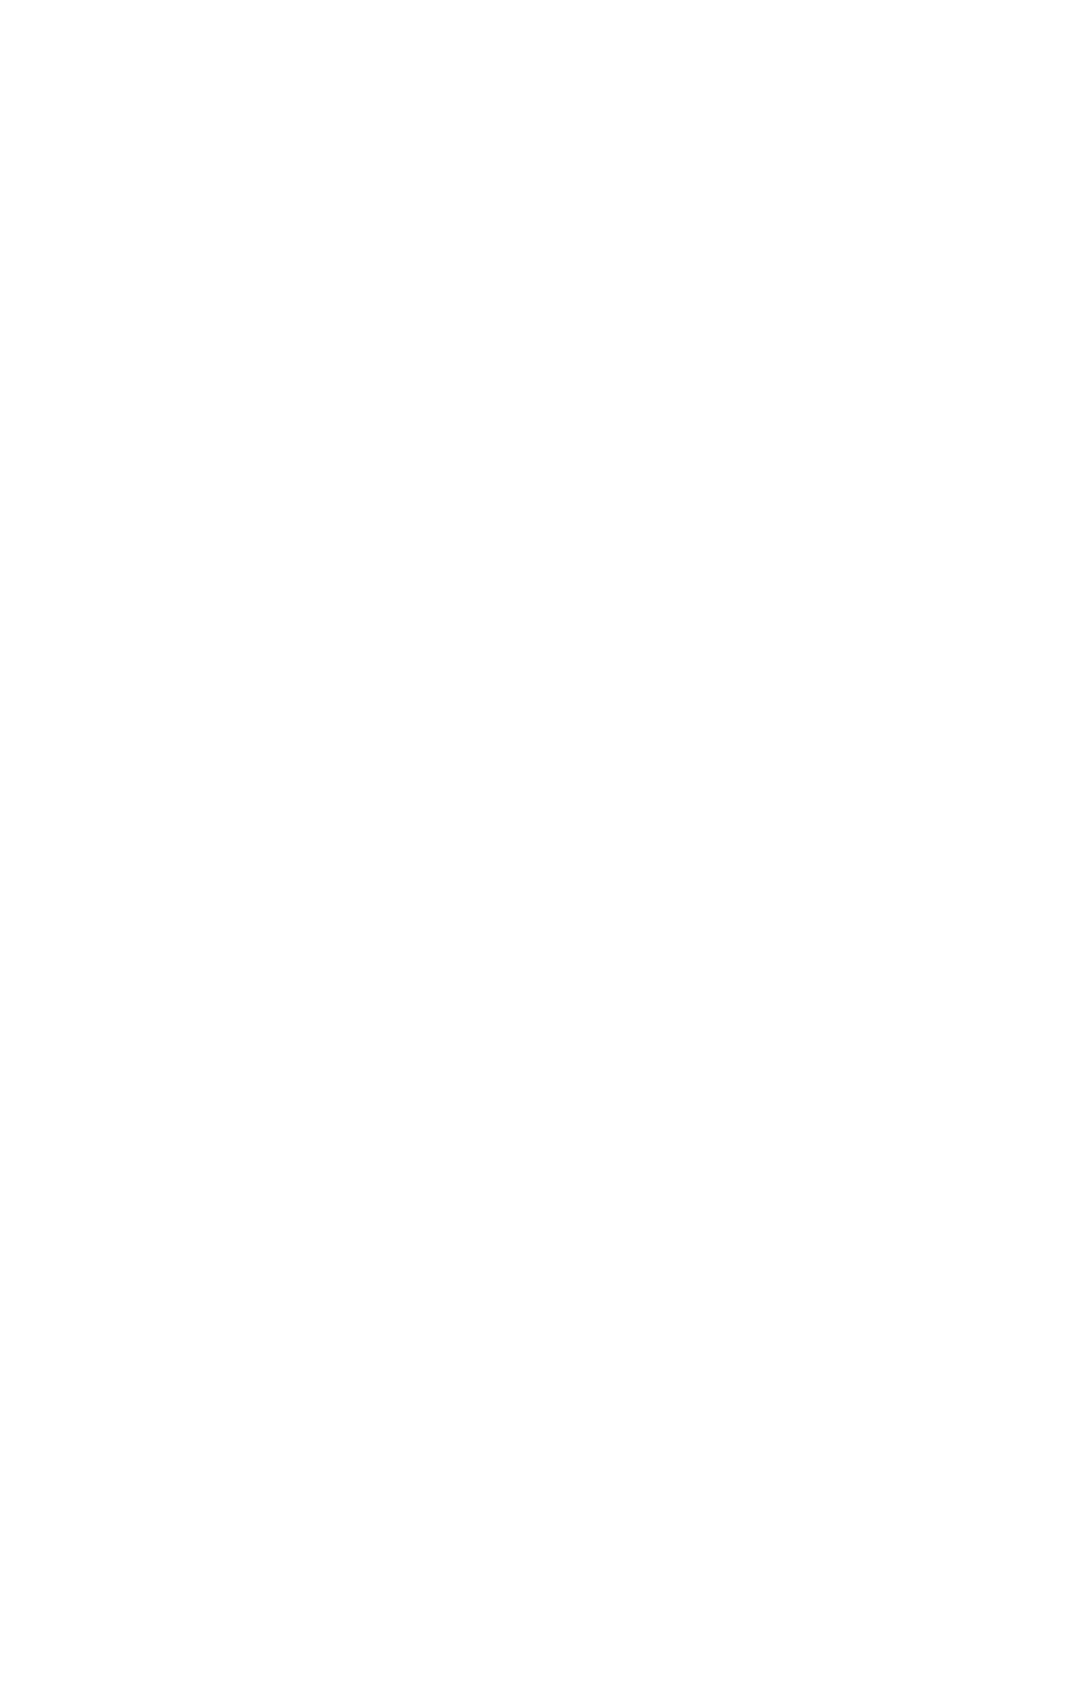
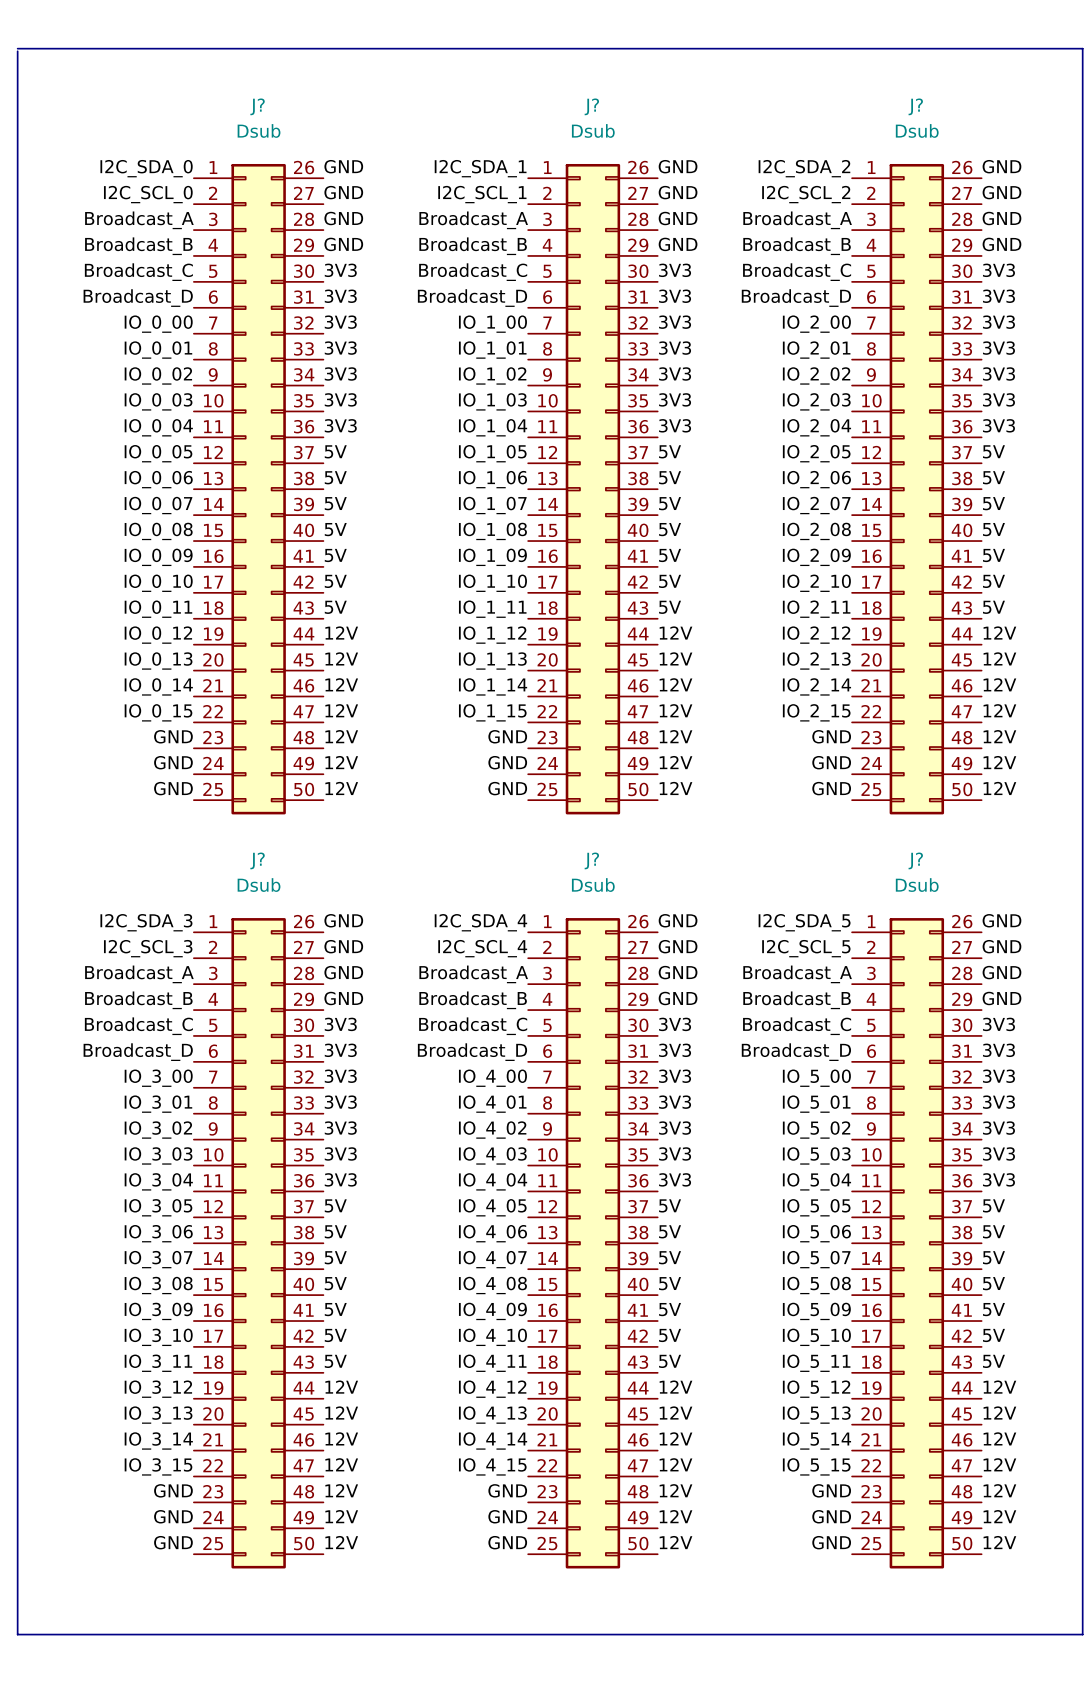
line: none -> (17, 48) (1082, 48) (1082, 1634) (17, 1634) (17, 51)
label: none -> GND (343, 166)
label: none -> GND (678, 166)
label: none -> GND (1001, 166)
label: none -> I2C_SDA_0 (146, 168)
label: none -> I2C_SDA_1 (480, 168)
label: none -> I2C_SDA_2 (804, 168)
label: none -> GND (343, 192)
label: none -> GND (678, 192)
label: none -> GND (1001, 192)
label: none -> I2C_SCL_0 (148, 194)
label: none -> I2C_SCL_1 (482, 194)
label: none -> I2C_SCL_2 (806, 194)
label: none -> GND (343, 218)
label: none -> GND (678, 218)
label: none -> GND (1001, 218)
label: none -> Broadcast_A (139, 220)
label: none -> Broadcast_A (473, 220)
label: none -> Broadcast_A (797, 220)
label: none -> GND (343, 244)
label: none -> GND (678, 244)
label: none -> GND (1001, 244)
label: none -> Broadcast_B (138, 246)
label: none -> Broadcast_B (473, 246)
label: none -> Broadcast_B (797, 246)
label: none -> 3V3 (340, 270)
label: none -> 3V3 (675, 270)
label: none -> 3V3 (998, 270)
label: none -> Broadcast_C (138, 272)
label: none -> Broadcast_C (473, 272)
label: none -> Broadcast_C (797, 272)
label: none -> 3V3 (340, 296)
label: none -> 3V3 (675, 296)
label: none -> 3V3 (998, 296)
label: none -> Broadcast_D (138, 298)
label: none -> Broadcast_D (472, 298)
label: none -> Broadcast_D (796, 298)
label: none -> 3V3 (340, 322)
label: none -> 3V3 (675, 322)
label: none -> 3V3 (998, 322)
label: none -> IO_0_00 (158, 324)
label: none -> IO_1_00 (492, 324)
label: none -> IO_2_00 (816, 324)
label: none -> 3V3 (340, 348)
label: none -> 3V3 (675, 348)
label: none -> 3V3 (998, 348)
label: none -> IO_0_01 (158, 350)
label: none -> IO_1_01 (492, 350)
label: none -> IO_2_01 (816, 350)
label: none -> 3V3 (340, 373)
label: none -> 3V3 (675, 373)
label: none -> 3V3 (998, 373)
label: none -> IO_0_02 (158, 375)
label: none -> IO_1_02 (492, 375)
label: none -> IO_2_02 (816, 375)
label: none -> 3V3 (340, 399)
label: none -> 3V3 (675, 399)
label: none -> 3V3 (998, 399)
label: none -> IO_0_03 (158, 401)
label: none -> IO_1_03 (492, 401)
label: none -> IO_2_03 (816, 401)
label: none -> 3V3 (340, 425)
label: none -> 3V3 (675, 425)
label: none -> 3V3 (998, 425)
label: none -> IO_0_04 (158, 427)
label: none -> IO_1_04 (493, 427)
label: none -> IO_2_04 (816, 427)
label: none -> 5V (335, 451)
label: none -> 5V (670, 451)
label: none -> 5V (993, 451)
label: none -> IO_0_05 (158, 453)
label: none -> IO_1_05 (492, 453)
label: none -> IO_2_05 (816, 453)
label: none -> 5V (335, 477)
label: none -> 5V (670, 477)
label: none -> 5V (993, 477)
label: none -> IO_0_06 (158, 479)
label: none -> IO_1_06 (492, 479)
label: none -> IO_2_06 (816, 479)
J?: none -> Dsub (258, 489)
J?: none -> Dsub (592, 489)
J?: none -> Dsub (916, 489)
label: none -> 5V (335, 503)
label: none -> 5V (670, 503)
label: none -> 5V (993, 503)
label: none -> IO_0_07 (158, 505)
label: none -> IO_1_07 (492, 505)
label: none -> IO_2_07 (816, 505)
label: none -> 5V (335, 529)
label: none -> 5V (670, 529)
label: none -> 5V (993, 529)
label: none -> IO_0_08 (158, 531)
label: none -> IO_1_08 (492, 531)
label: none -> IO_2_08 (816, 531)
label: none -> 5V (335, 555)
label: none -> 5V (670, 555)
label: none -> 5V (993, 555)
label: none -> IO_0_09 (158, 557)
label: none -> IO_1_09 (492, 557)
label: none -> IO_2_09 (816, 557)
label: none -> 5V (335, 581)
label: none -> 5V (670, 581)
label: none -> 5V (993, 581)
label: none -> IO_0_10 (158, 583)
label: none -> IO_1_10 (492, 583)
label: none -> IO_2_10 (816, 583)
label: none -> 5V (335, 607)
label: none -> 5V (670, 607)
label: none -> 5V (993, 607)
label: none -> IO_0_11 (158, 609)
label: none -> IO_1_11 (492, 609)
label: none -> IO_2_11 (816, 609)
label: none -> 12V (341, 632)
label: none -> 12V (675, 632)
label: none -> 12V (999, 632)
label: none -> IO_0_12 (158, 635)
label: none -> IO_1_12 (492, 635)
label: none -> IO_2_12 (816, 635)
label: none -> 12V (341, 658)
label: none -> 12V (675, 658)
label: none -> 12V (999, 658)
label: none -> IO_0_13 (158, 661)
label: none -> IO_1_13 (492, 661)
label: none -> IO_2_13 (816, 661)
label: none -> 12V (341, 684)
label: none -> 12V (675, 684)
label: none -> 12V (999, 684)
label: none -> IO_0_14 (158, 686)
label: none -> IO_1_14 (493, 686)
label: none -> IO_2_14 (816, 686)
label: none -> 12V (341, 710)
label: none -> 12V (675, 710)
label: none -> 12V (999, 710)
label: none -> IO_0_15 (158, 712)
label: none -> IO_1_15 (492, 712)
label: none -> IO_2_15 (816, 712)
label: none -> GND (173, 736)
label: none -> 12V (341, 736)
label: none -> GND (507, 736)
label: none -> 12V (675, 736)
label: none -> GND (831, 736)
label: none -> 12V (999, 736)
label: none -> GND (173, 762)
label: none -> 12V (341, 762)
label: none -> GND (507, 762)
label: none -> 12V (675, 762)
label: none -> GND (831, 762)
label: none -> 12V (999, 762)
label: none -> GND (173, 788)
label: none -> 12V (341, 788)
label: none -> GND (507, 788)
label: none -> 12V (675, 788)
label: none -> GND (831, 788)
label: none -> 12V (999, 788)
label: none -> GND (343, 920)
label: none -> GND (678, 920)
label: none -> GND (1001, 920)
label: none -> I2C_SDA_3 (146, 922)
label: none -> I2C_SDA_4 (480, 922)
label: none -> I2C_SDA_5 (804, 922)
label: none -> GND (343, 946)
label: none -> GND (678, 946)
label: none -> GND (1001, 946)
label: none -> I2C_SCL_3 (148, 948)
label: none -> I2C_SCL_4 (482, 948)
label: none -> I2C_SCL_5 (806, 948)
label: none -> GND (343, 972)
label: none -> GND (678, 972)
label: none -> GND (1001, 972)
label: none -> Broadcast_A (139, 974)
label: none -> Broadcast_A (473, 974)
label: none -> Broadcast_A (797, 974)
label: none -> GND (343, 998)
label: none -> GND (678, 998)
label: none -> GND (1001, 998)
label: none -> Broadcast_B (138, 1000)
label: none -> Broadcast_B (473, 1000)
label: none -> Broadcast_B (797, 1000)
label: none -> 3V3 (340, 1024)
label: none -> 3V3 (675, 1024)
label: none -> 3V3 (998, 1024)
label: none -> Broadcast_C (138, 1026)
label: none -> Broadcast_C (473, 1026)
label: none -> Broadcast_C (797, 1026)
label: none -> 3V3 (340, 1050)
label: none -> 3V3 (675, 1050)
label: none -> 3V3 (998, 1050)
label: none -> Broadcast_D (138, 1052)
label: none -> Broadcast_D (472, 1052)
label: none -> Broadcast_D (796, 1052)
label: none -> 3V3 (340, 1076)
label: none -> 3V3 (675, 1076)
label: none -> 3V3 (998, 1076)
label: none -> IO_3_00 (158, 1078)
label: none -> IO_4_00 (492, 1078)
label: none -> IO_5_00 (816, 1078)
label: none -> 3V3 (340, 1102)
label: none -> 3V3 (675, 1102)
label: none -> 3V3 (998, 1102)
label: none -> IO_3_01 (158, 1104)
label: none -> IO_4_01 (492, 1104)
label: none -> IO_5_01 (816, 1104)
label: none -> 3V3 (340, 1128)
label: none -> 3V3 (675, 1128)
label: none -> 3V3 (998, 1128)
label: none -> IO_3_02 (158, 1130)
label: none -> IO_4_02 (492, 1130)
label: none -> IO_5_02 (816, 1130)
label: none -> 3V3 (340, 1153)
label: none -> 3V3 (675, 1153)
label: none -> 3V3 (998, 1153)
label: none -> IO_3_03 (158, 1155)
label: none -> IO_4_03 (492, 1155)
label: none -> IO_5_03 (816, 1155)
label: none -> 3V3 (340, 1179)
label: none -> 3V3 (675, 1179)
label: none -> 3V3 (998, 1179)
label: none -> IO_3_04 (158, 1181)
label: none -> IO_4_04 (493, 1181)
label: none -> IO_5_04 (816, 1181)
label: none -> 5V (335, 1205)
label: none -> 5V (670, 1205)
label: none -> 5V (993, 1205)
label: none -> IO_3_05 (158, 1207)
label: none -> IO_4_05 (492, 1207)
label: none -> IO_5_05 (816, 1207)
label: none -> 5V (335, 1231)
label: none -> 5V (670, 1231)
label: none -> 5V (993, 1231)
label: none -> IO_3_06 (158, 1233)
label: none -> IO_4_06 (492, 1233)
label: none -> IO_5_06 (816, 1233)
J?: none -> Dsub (258, 1243)
J?: none -> Dsub (592, 1243)
J?: none -> Dsub (916, 1243)
label: none -> 5V (335, 1257)
label: none -> 5V (670, 1257)
label: none -> 5V (993, 1257)
label: none -> IO_3_07 (158, 1259)
label: none -> IO_4_07 (492, 1259)
label: none -> IO_5_07 (816, 1259)
label: none -> 5V (335, 1283)
label: none -> 5V (670, 1283)
label: none -> 5V (993, 1283)
label: none -> IO_3_08 (158, 1285)
label: none -> IO_4_08 (492, 1285)
label: none -> IO_5_08 (816, 1285)
label: none -> 5V (335, 1309)
label: none -> 5V (670, 1309)
label: none -> 5V (993, 1309)
label: none -> IO_3_09 (158, 1311)
label: none -> IO_4_09 (492, 1311)
label: none -> IO_5_09 (816, 1311)
label: none -> 5V (335, 1335)
label: none -> 5V (670, 1335)
label: none -> 5V (993, 1335)
label: none -> IO_3_10 (158, 1337)
label: none -> IO_4_10 (492, 1337)
label: none -> IO_5_10 (816, 1337)
label: none -> 5V (335, 1361)
label: none -> 5V (670, 1361)
label: none -> 5V (993, 1361)
label: none -> IO_3_11 (158, 1363)
label: none -> IO_4_11 (492, 1363)
label: none -> IO_5_11 (816, 1363)
label: none -> 12V (341, 1387)
label: none -> 12V (675, 1387)
label: none -> 12V (999, 1387)
label: none -> IO_3_12 (158, 1389)
label: none -> IO_4_12 (492, 1389)
label: none -> IO_5_12 (816, 1389)
label: none -> 12V (341, 1412)
label: none -> 12V (675, 1412)
label: none -> 12V (999, 1412)
label: none -> IO_3_13 (158, 1415)
label: none -> IO_4_13 (492, 1415)
label: none -> IO_5_13 (816, 1415)
label: none -> 12V (341, 1438)
label: none -> 12V (675, 1438)
label: none -> 12V (999, 1438)
label: none -> IO_3_14 (158, 1440)
label: none -> IO_4_14 (493, 1440)
label: none -> IO_5_14 (816, 1440)
label: none -> 12V (341, 1464)
label: none -> 12V (675, 1464)
label: none -> 12V (999, 1464)
label: none -> IO_3_15 (158, 1466)
label: none -> IO_4_15 (492, 1466)
label: none -> IO_5_15 (816, 1466)
label: none -> GND (173, 1490)
label: none -> 12V (341, 1490)
label: none -> GND (507, 1490)
label: none -> 12V (675, 1490)
label: none -> GND (831, 1490)
label: none -> 12V (999, 1490)
label: none -> GND (173, 1516)
label: none -> 12V (341, 1516)
label: none -> GND (507, 1516)
label: none -> 12V (675, 1516)
label: none -> GND (831, 1516)
label: none -> 12V (999, 1516)
label: none -> GND (173, 1542)
label: none -> 12V (341, 1542)
label: none -> GND (507, 1542)
label: none -> 12V (675, 1542)
label: none -> GND (831, 1542)
label: none -> 12V (999, 1542)

